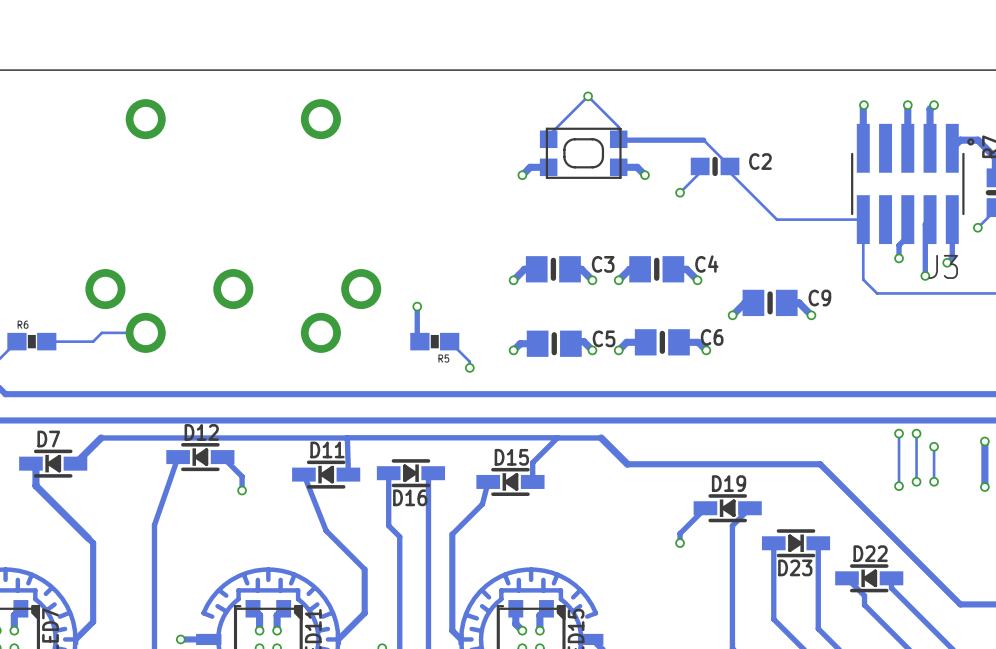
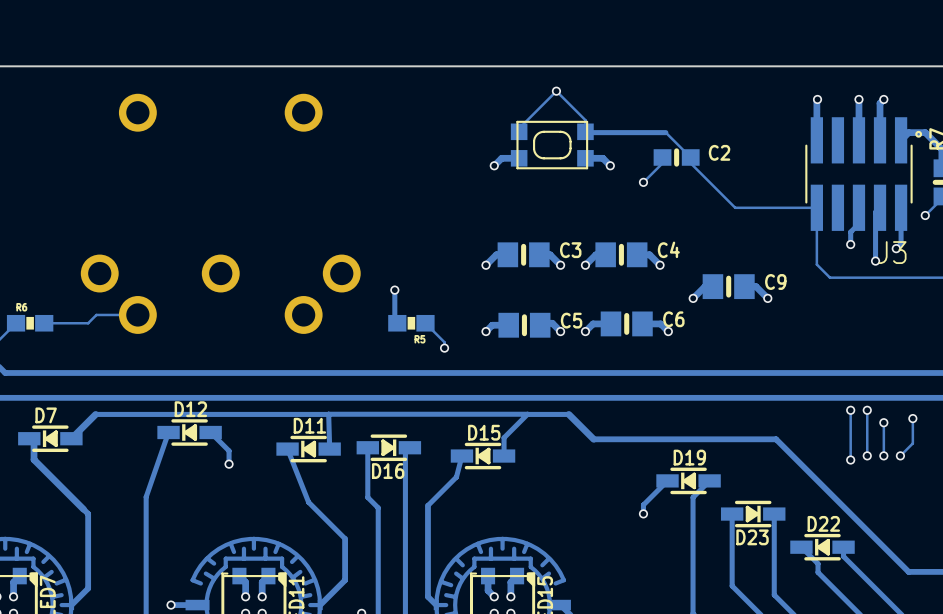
track: (984, 441) (984, 487) -> none
via: (984, 441) -> none
track: none -> (912, 418) (912, 443) (900, 455)
via: none -> (912, 418)
via: none -> (900, 455)
via: (984, 487) -> none

